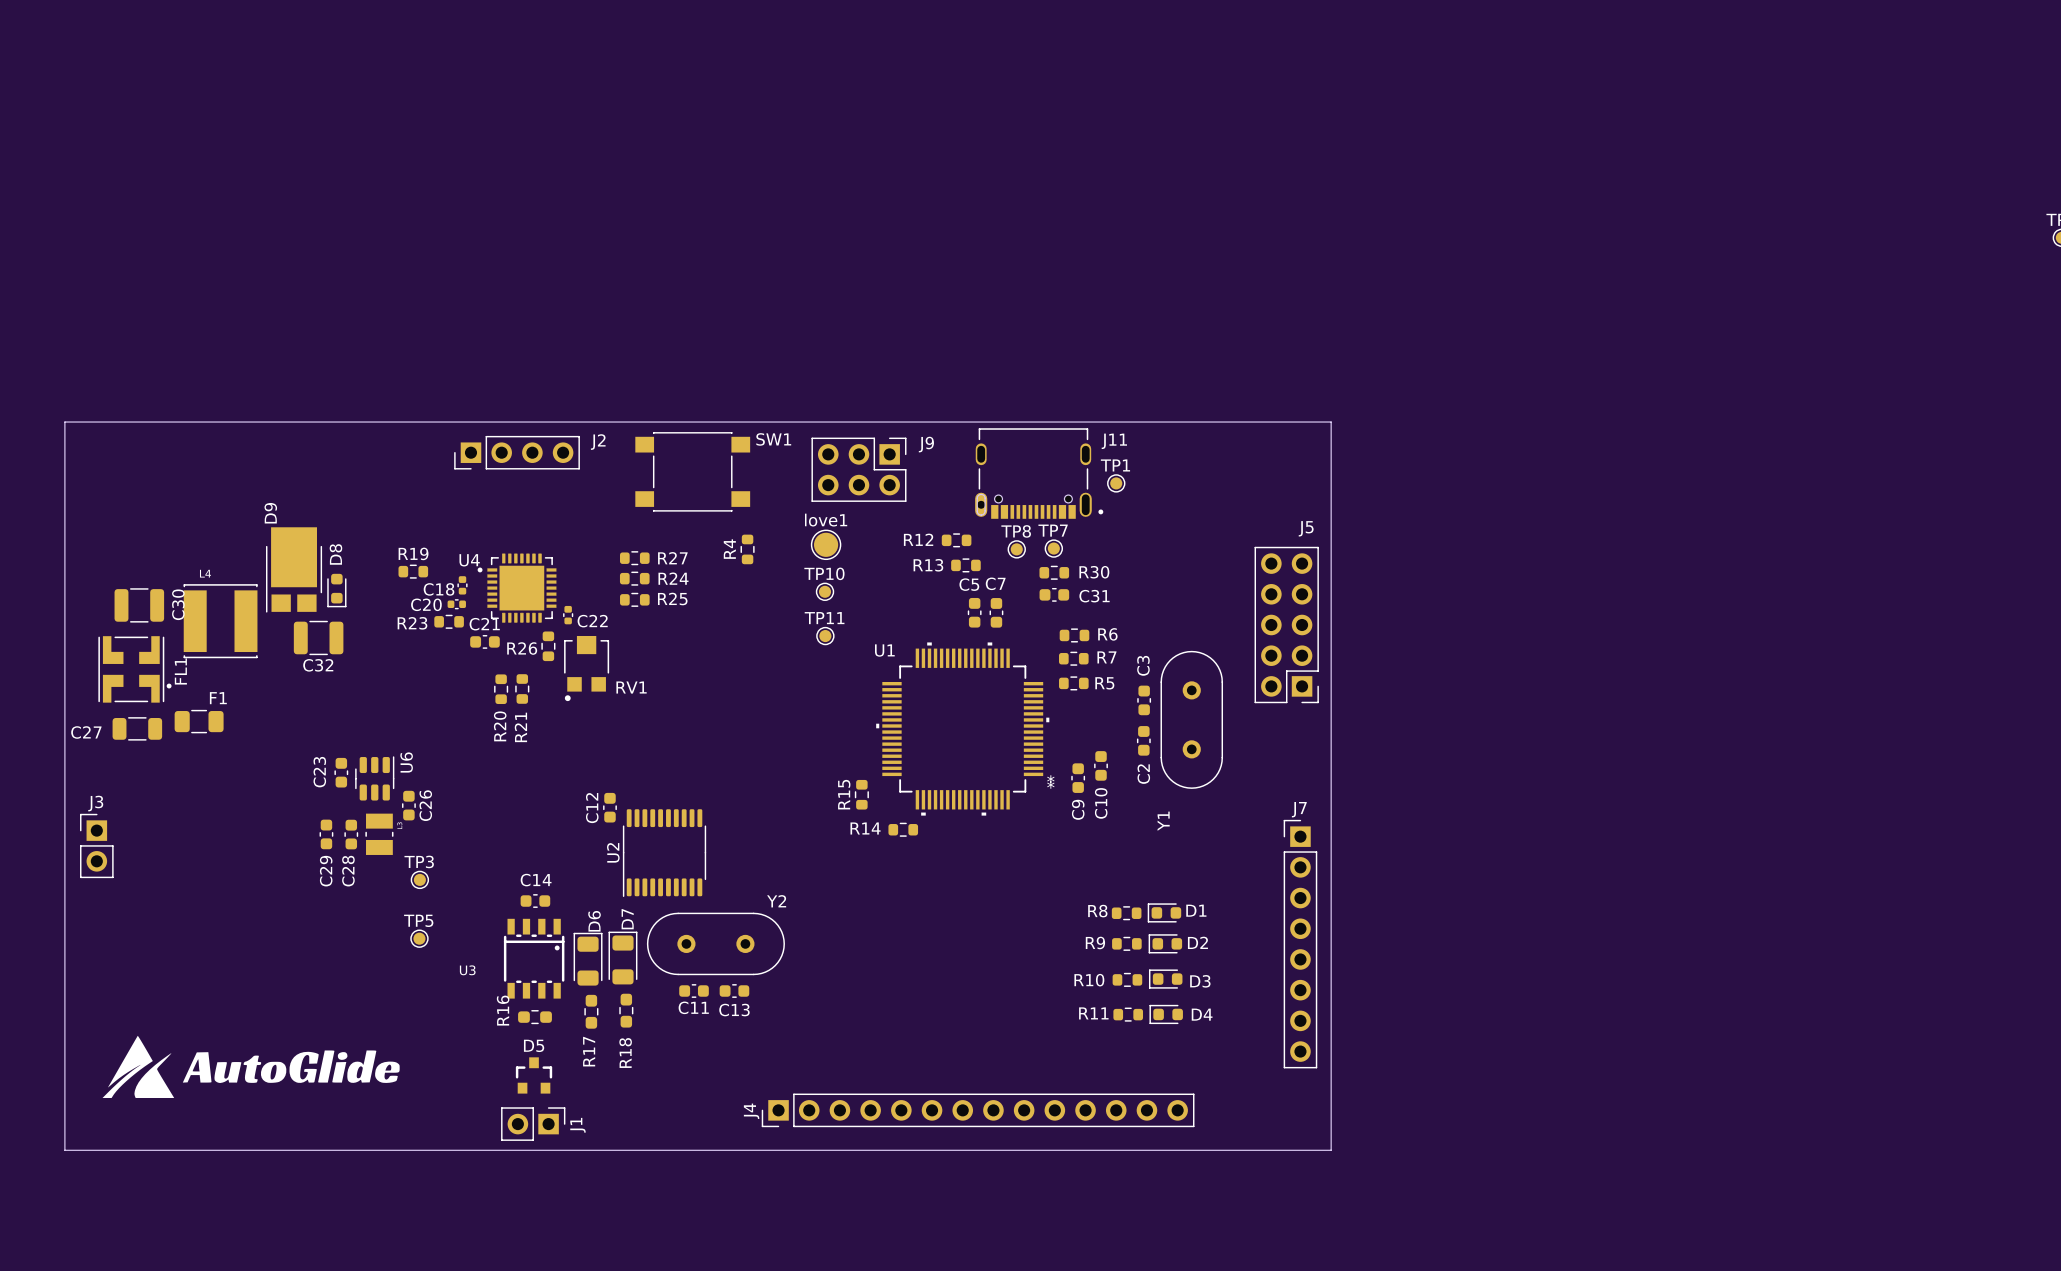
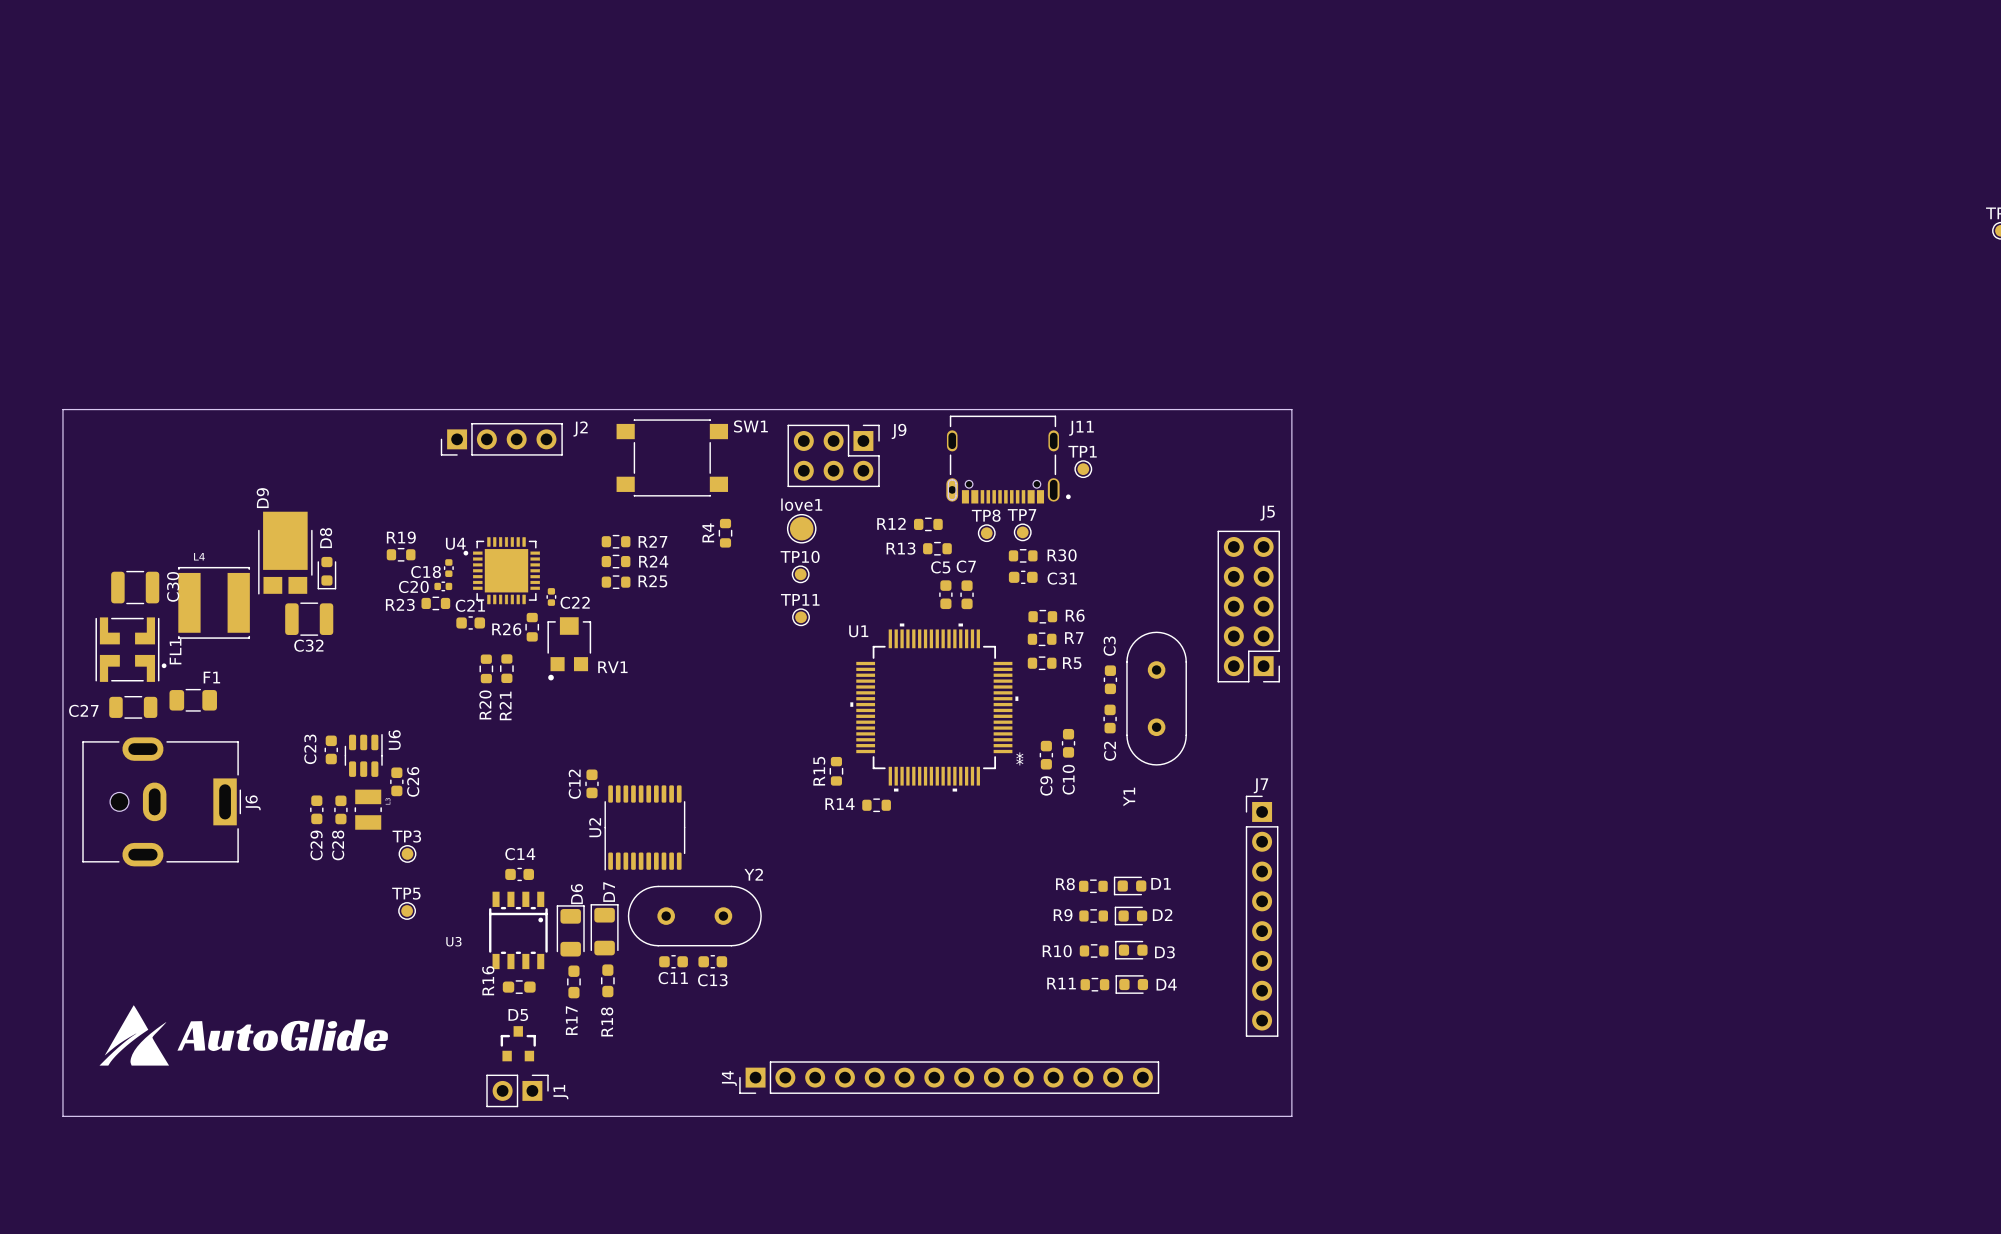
J6: none -> (161, 801)
J3: (96, 845) -> none

